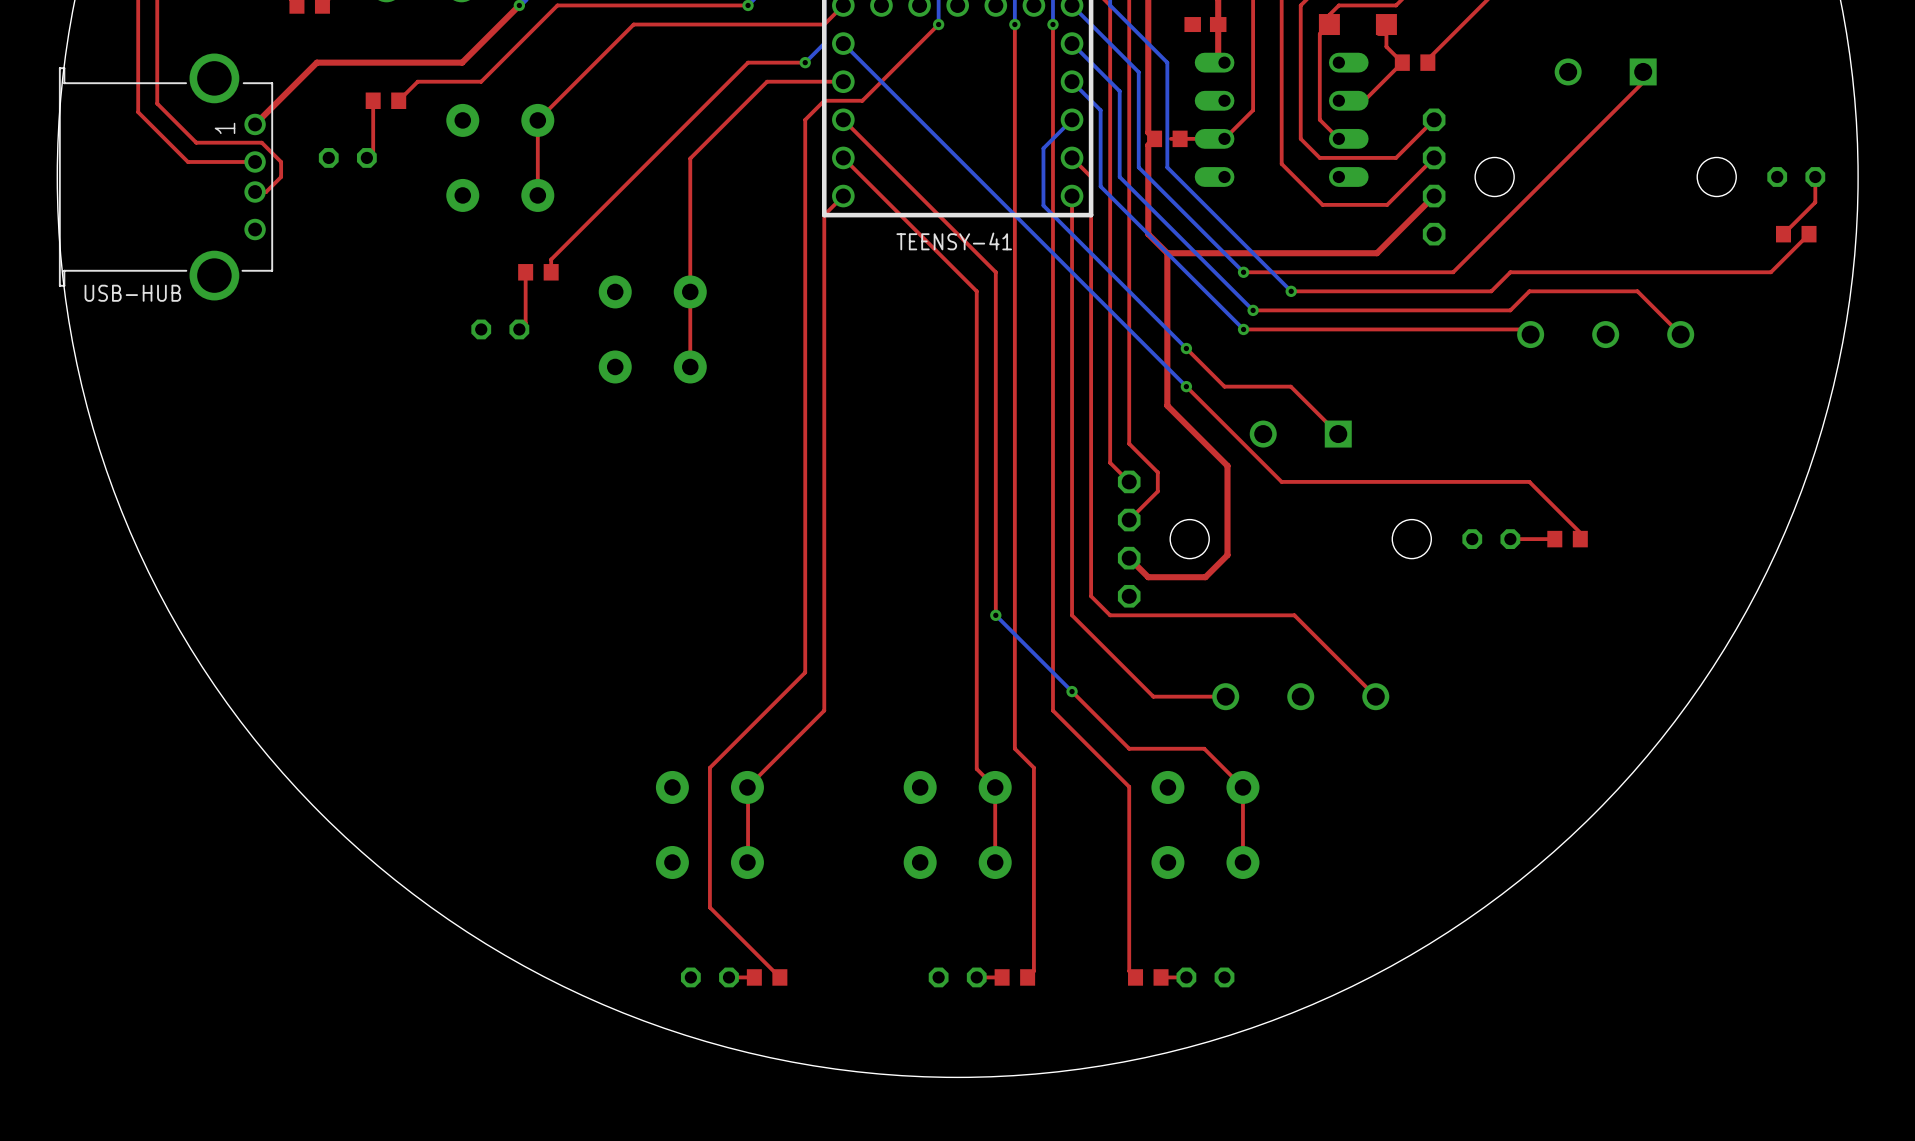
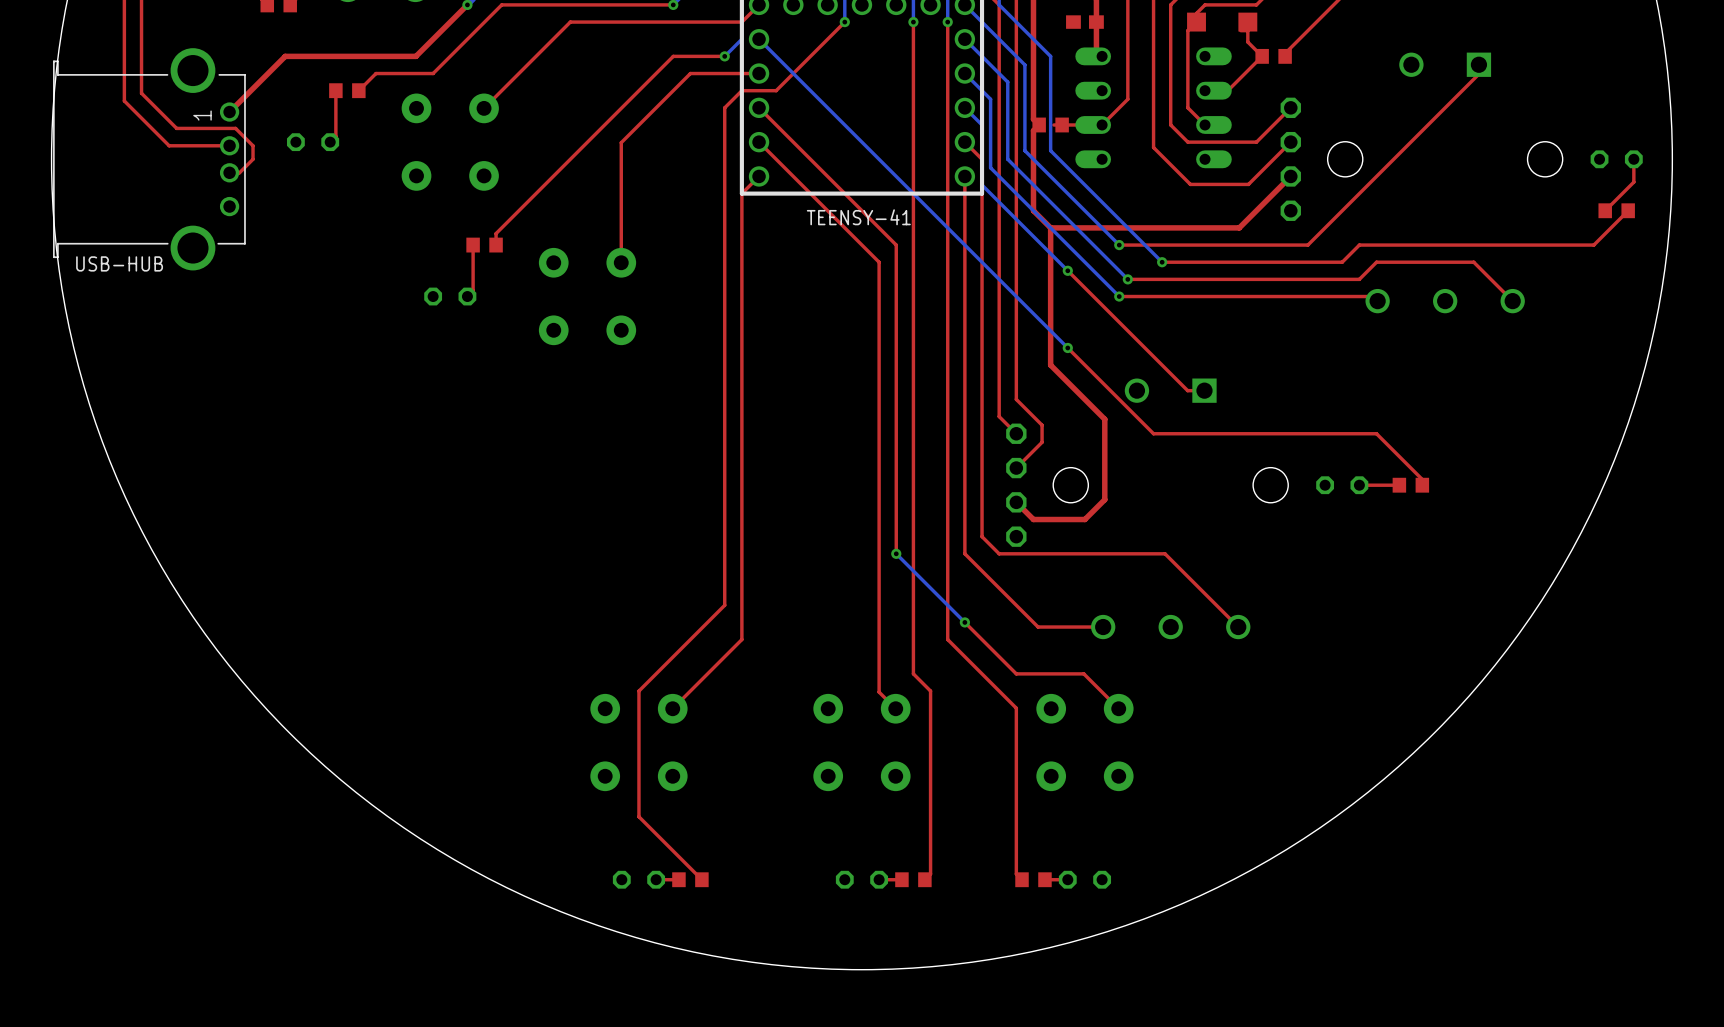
bottom track: (1072, 119) (1043, 148) (1043, 205) (1186, 348) -> (964, 107) (982, 124) (982, 185) (1067, 270)
top track: (537, 120) (537, 195) -> none
top track: (690, 291) (690, 366) -> none
top track: (1186, 348) (1224, 386) (1290, 386) (1338, 434) -> (1067, 270) (1187, 390) (1204, 390)
via position: (1186, 348) -> (1067, 270)
top track: (748, 786) (747, 862) -> none
top track: (995, 787) (995, 862) -> none
top track: (1242, 787) (1242, 862) -> none

